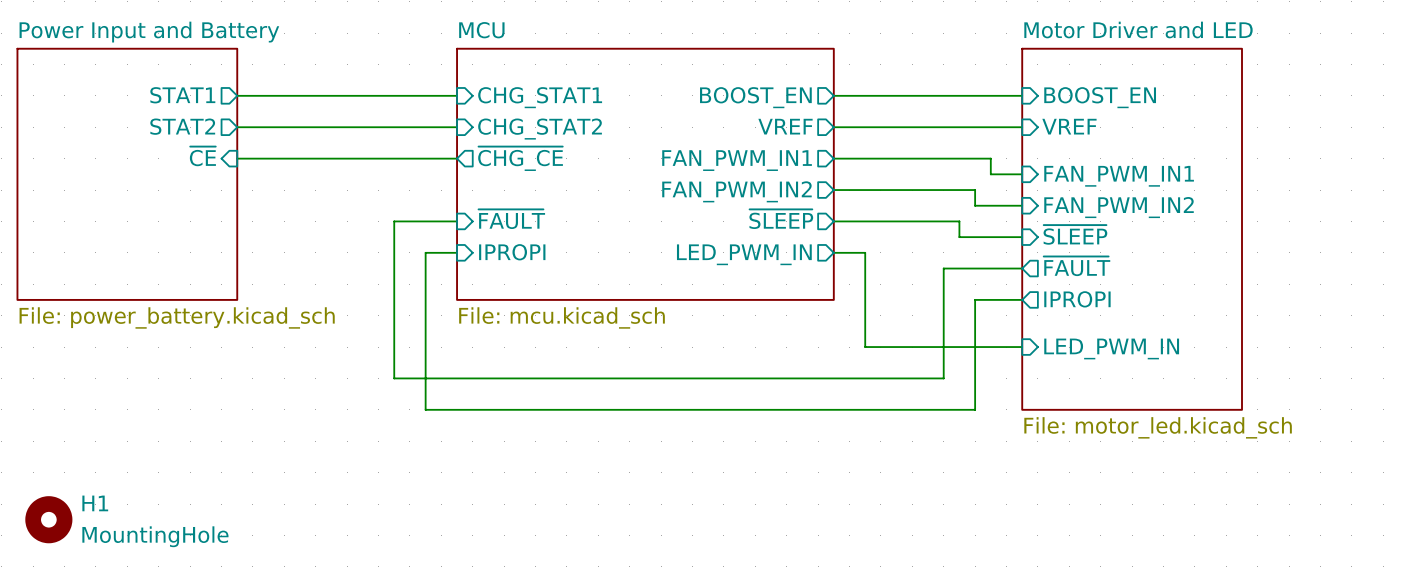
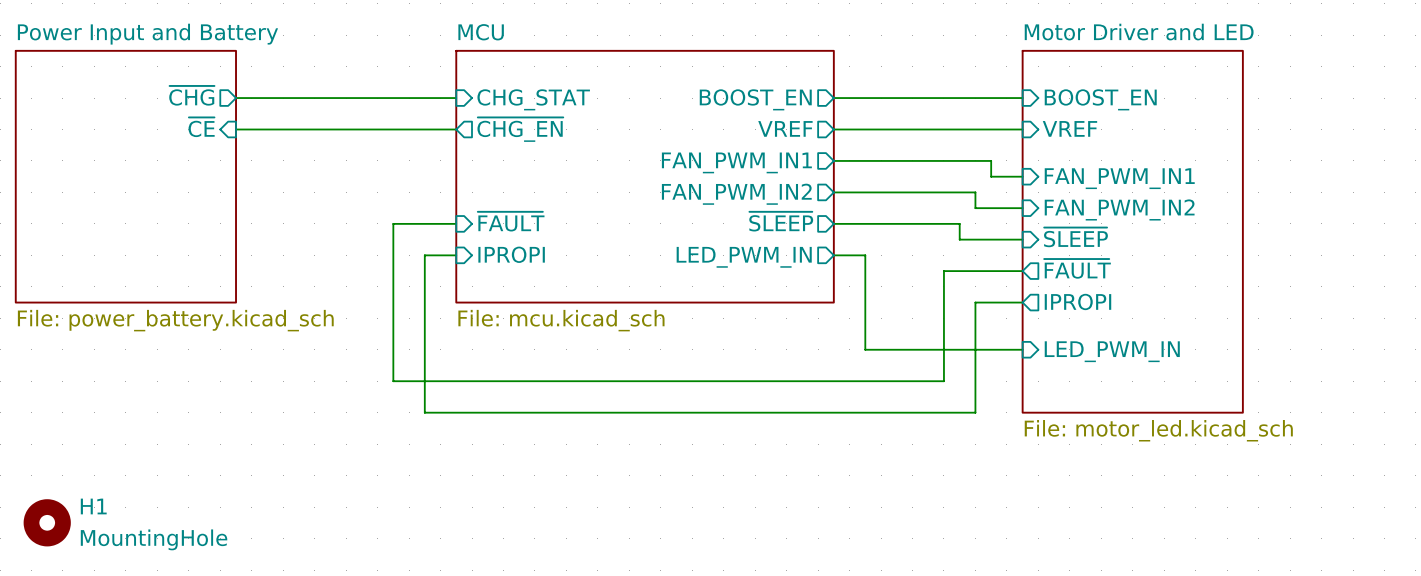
sheet pin: STAT1 (182, 95) -> ~{CHG} (191, 95)
sheet pin: CHG_STAT1 (540, 97) -> CHG_STAT (533, 99)
sheet pin shape: output (182, 126) -> input (201, 127)
sheet pin: STAT2 (182, 126) -> ~{CE} (201, 127)
sheet pin shape: input (540, 129) -> output (520, 129)
sheet pin: CHG_STAT2 (540, 129) -> ~{CHG_EN} (520, 129)
sheet pin: ~{CE} (202, 156) -> none
wire: (237, 158) (457, 158) -> none
sheet pin: ~{CHG_CE} (520, 158) -> none

